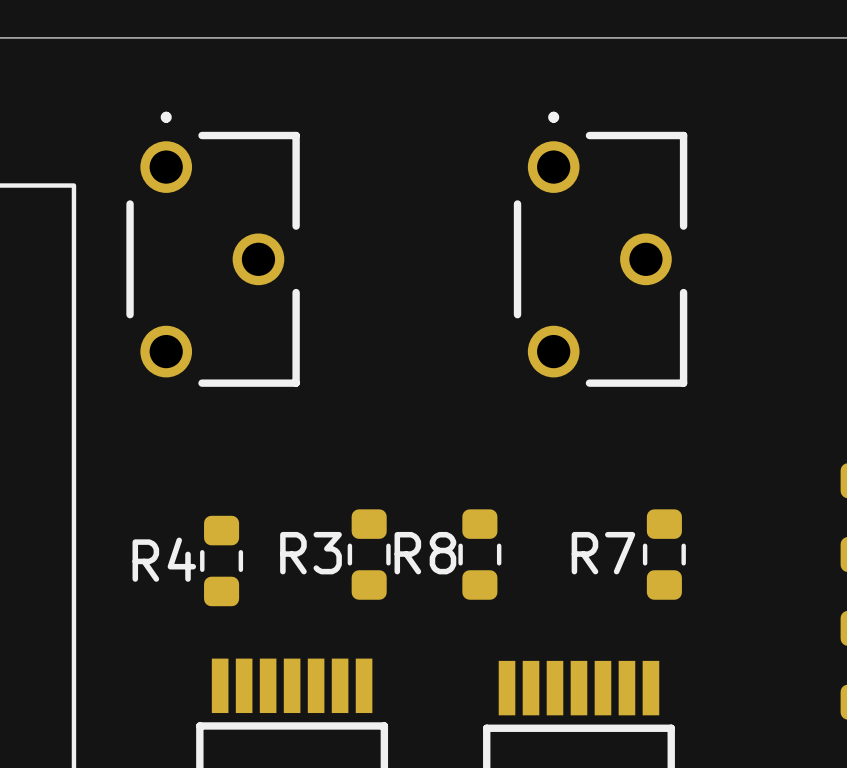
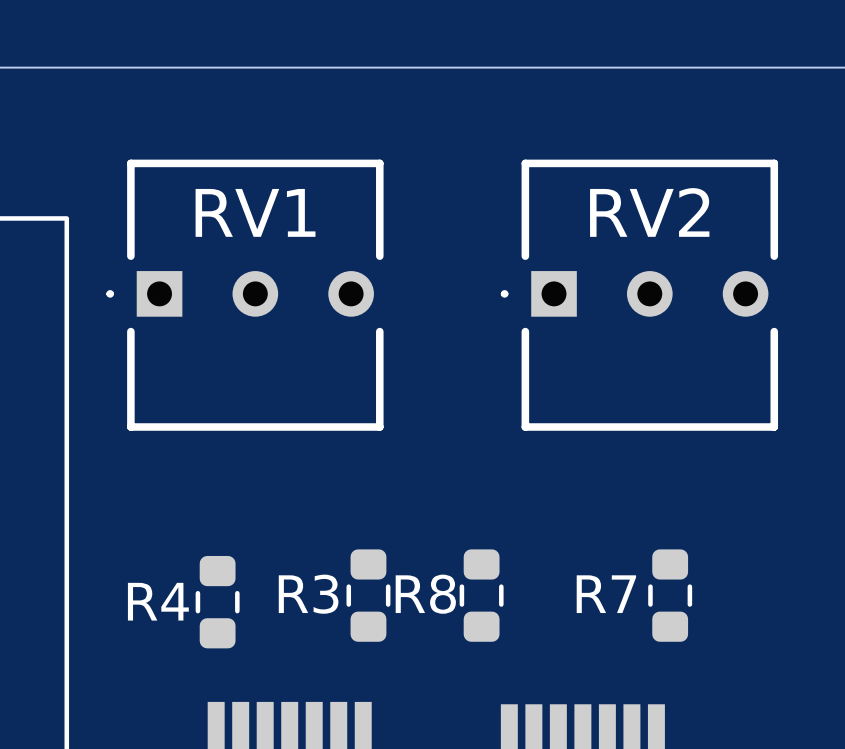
part: (213, 249) -> none
part: (600, 249) -> none
RV1: none -> (244, 295)
RV2: none -> (639, 295)

